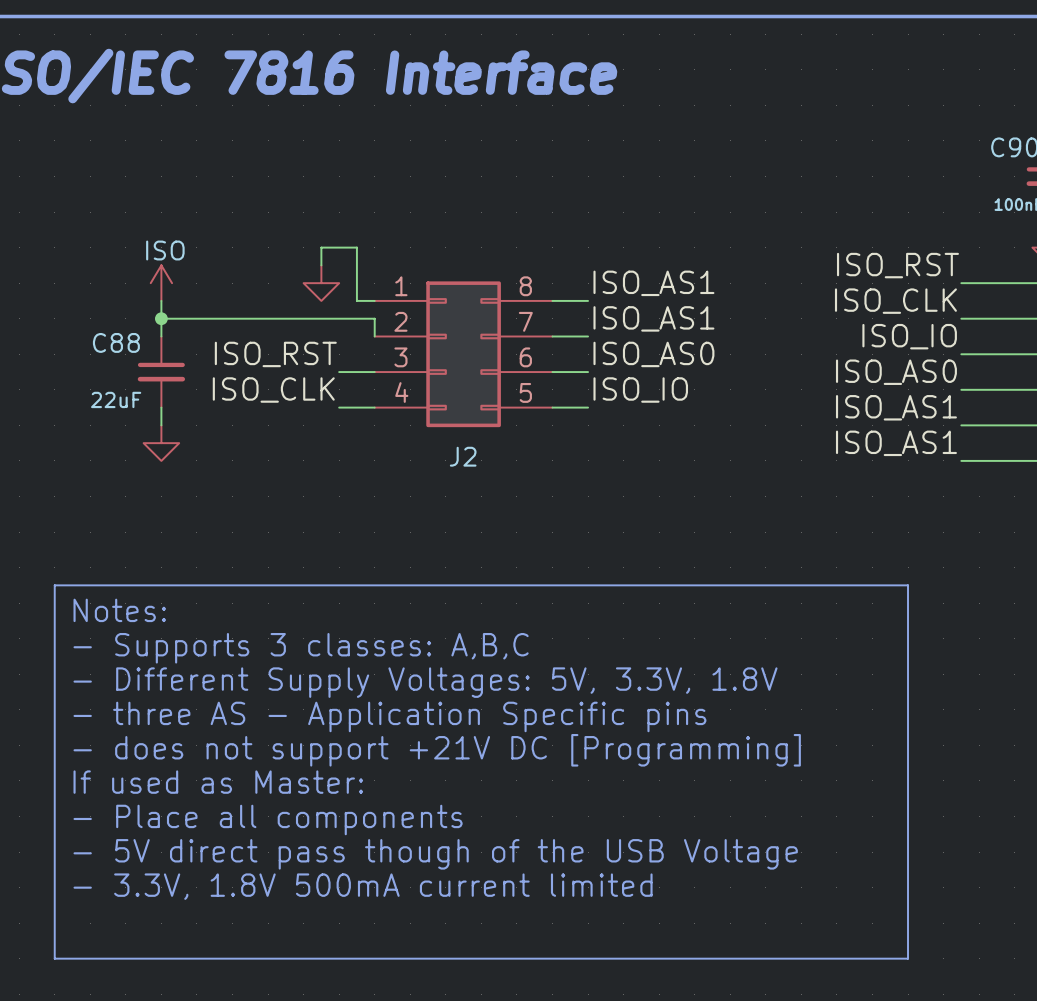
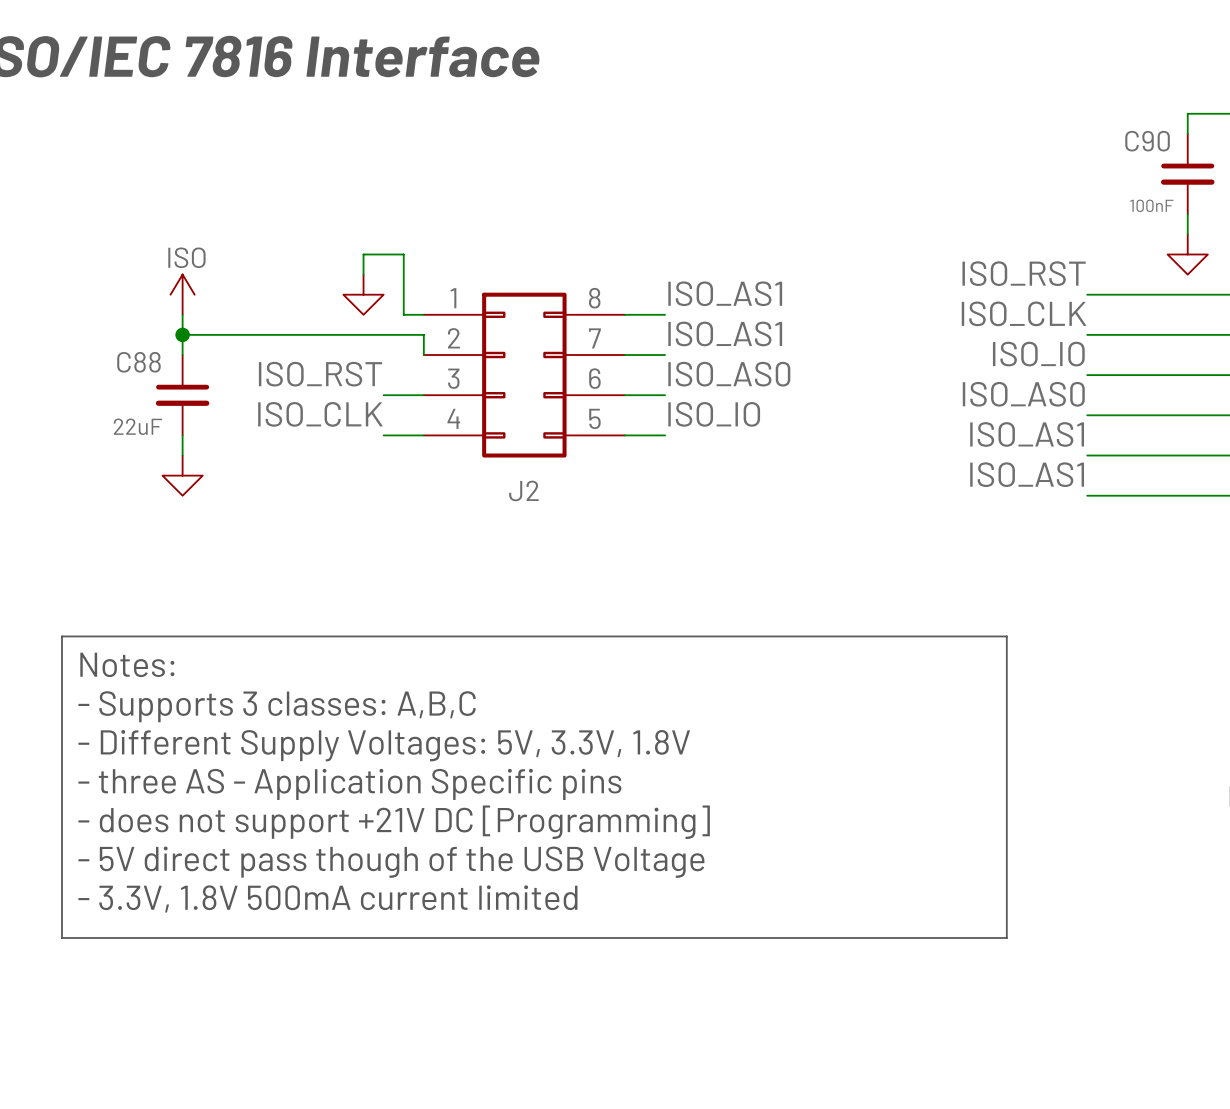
line: (890, 585) (908, 585) (908, 958) (54, 958) (54, 852) -> (1006, 636) (1006, 937) (61, 937)
text: If used as Master: (218, 782) -> - 5V direct pass though of the USB Voltage (391, 862)
text: - Place all components (268, 819) -> - 3.3V, 1.8V 500mA current limited (327, 898)
text: - 5V direct pass though of the USB Voltage (435, 854) -> none
text: - 3.3V, 1.8V 500mA current limited (363, 886) -> none

